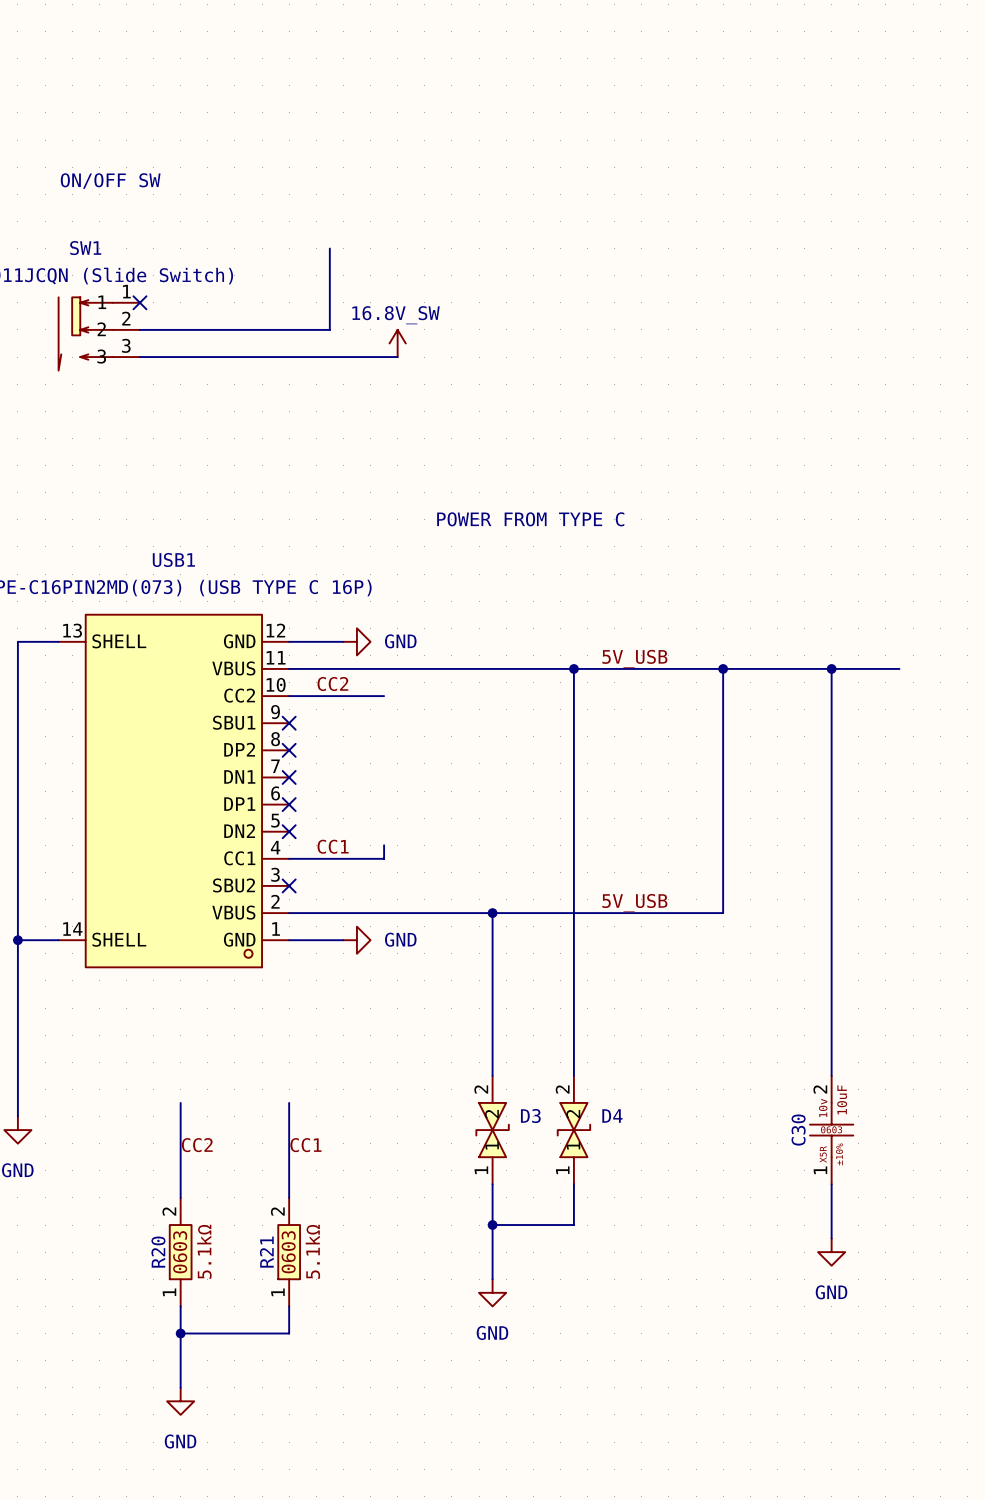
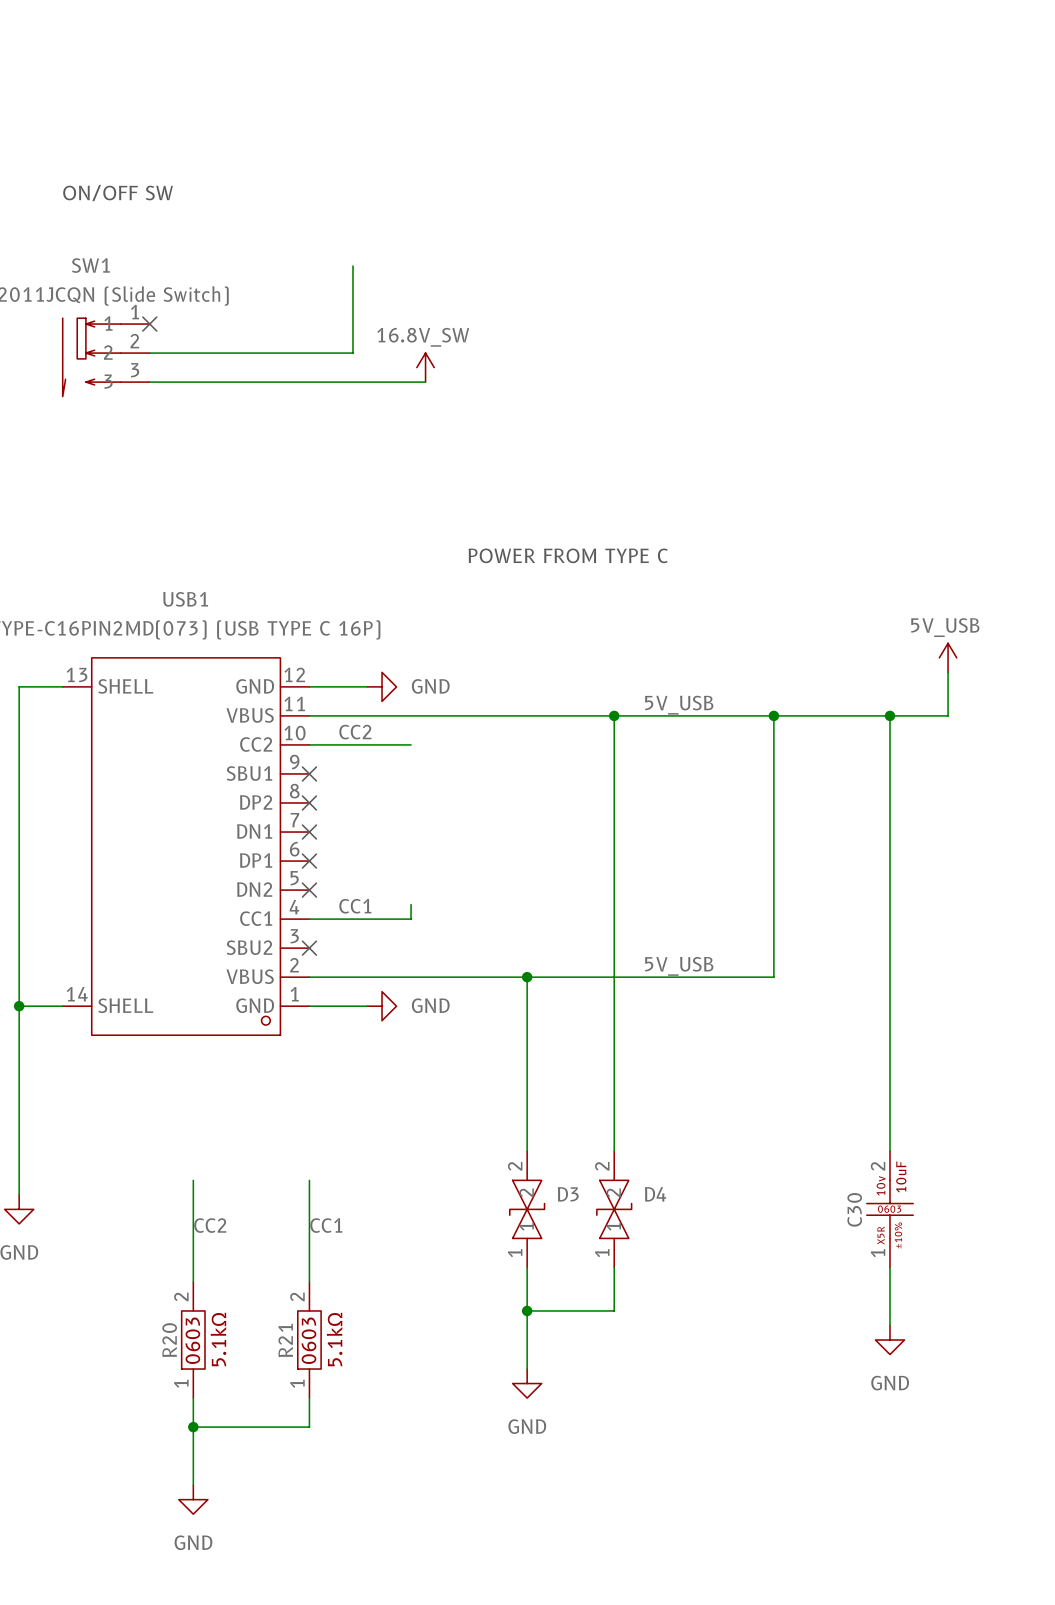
power symbol: none -> 5V_USB (948, 657)
wire: (885, 668) (899, 668) -> (948, 715) (948, 672)

